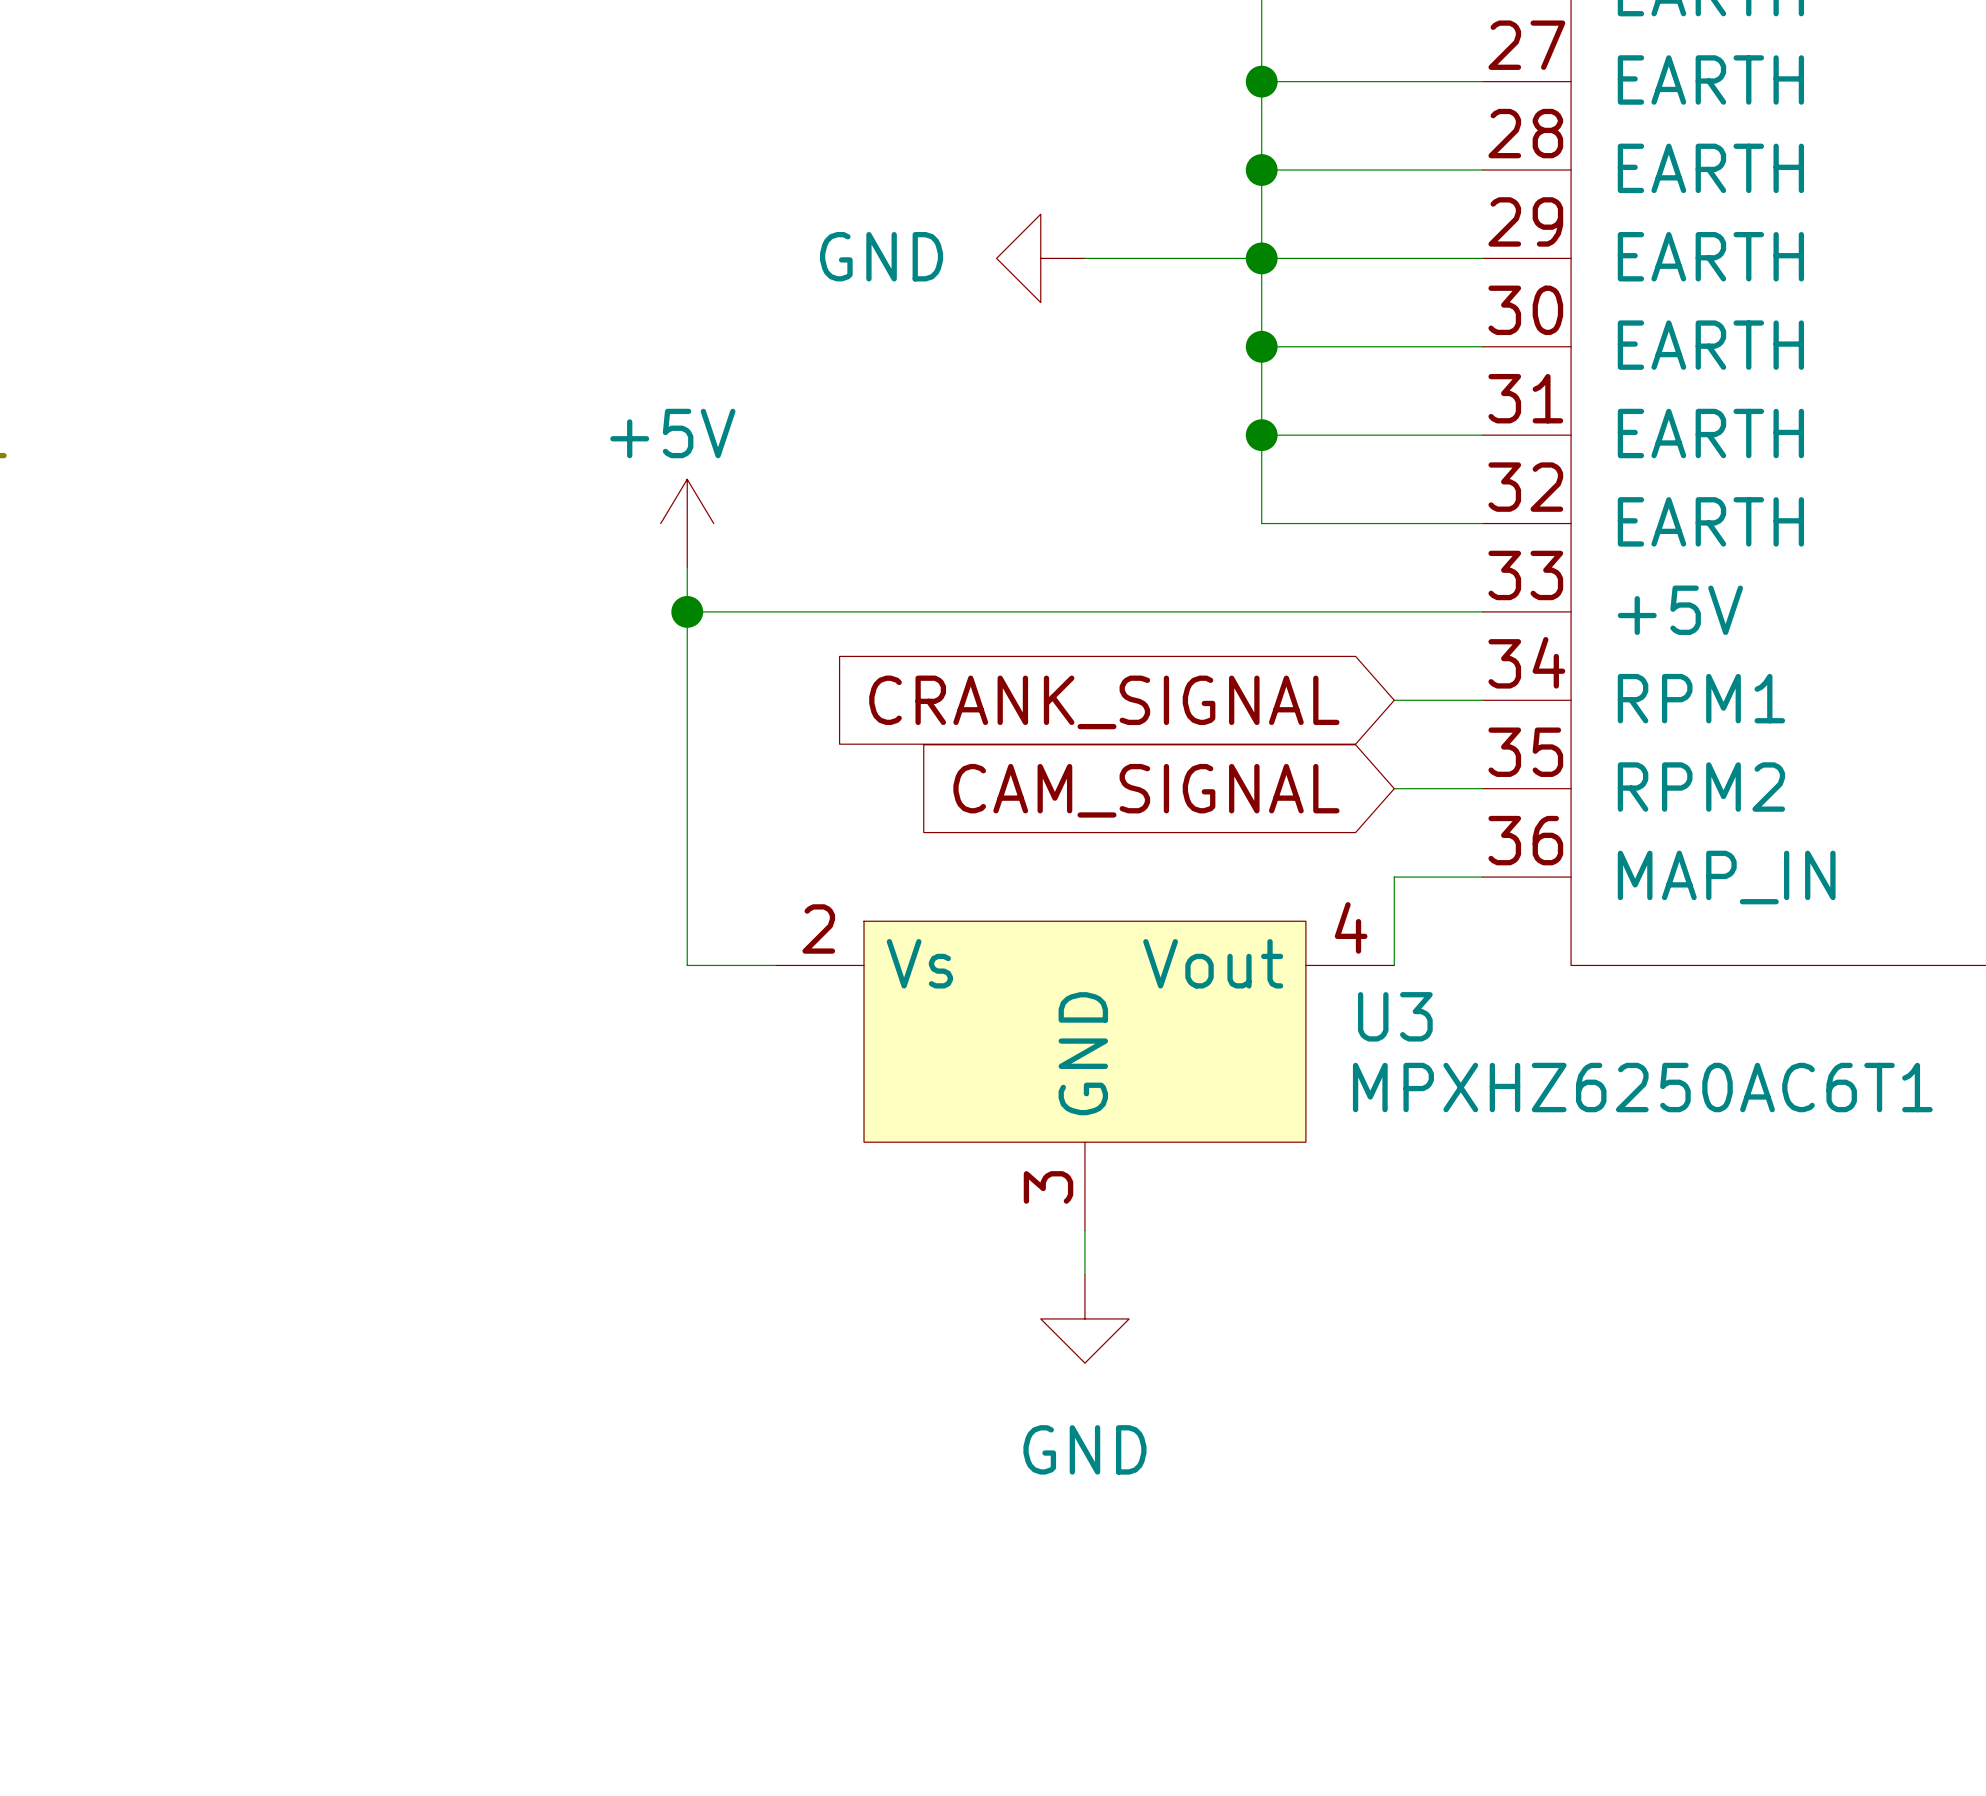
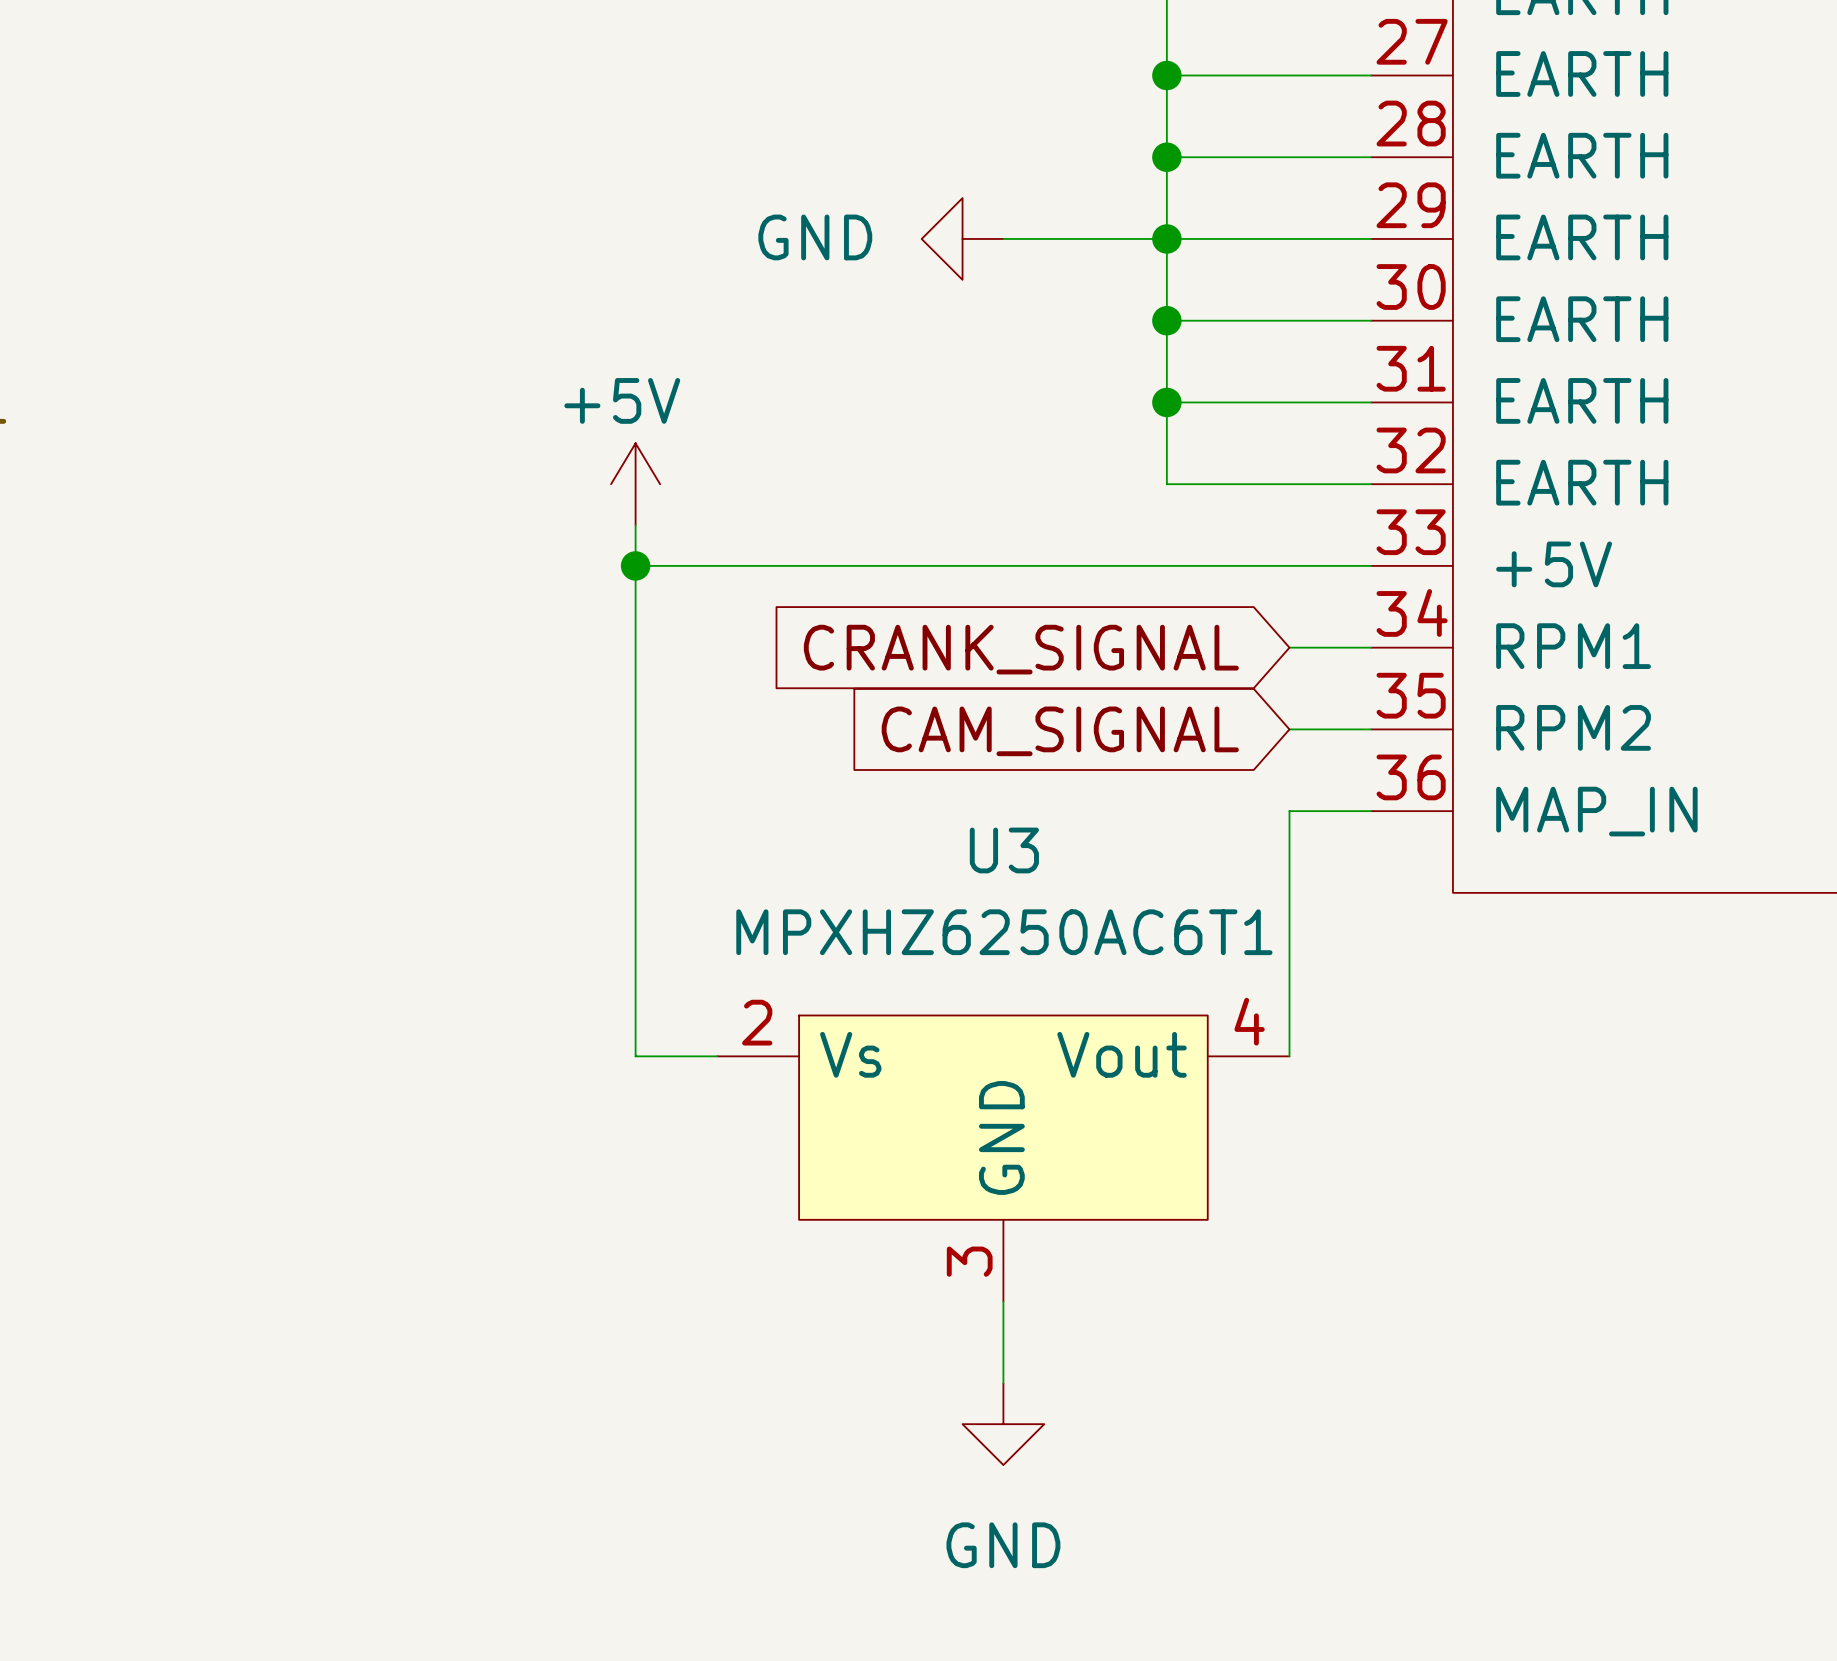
wire: (687, 965) (775, 965) -> (635, 892) (635, 1056) (717, 1056)
wire: none -> (1289, 892) (1289, 1056)
U3 name position: U3 (1395, 1016) -> U3 (1004, 850)
U3 position: (1084, 1075) -> (1003, 1158)
U3 value position: MPXHZ6250AC6T1 (1642, 1087) -> MPXHZ6250AC6T1 (1004, 932)
power symbol position: GND (1084, 1318) -> GND (1003, 1424)
wire: none -> (1003, 1301) (1003, 1383)

